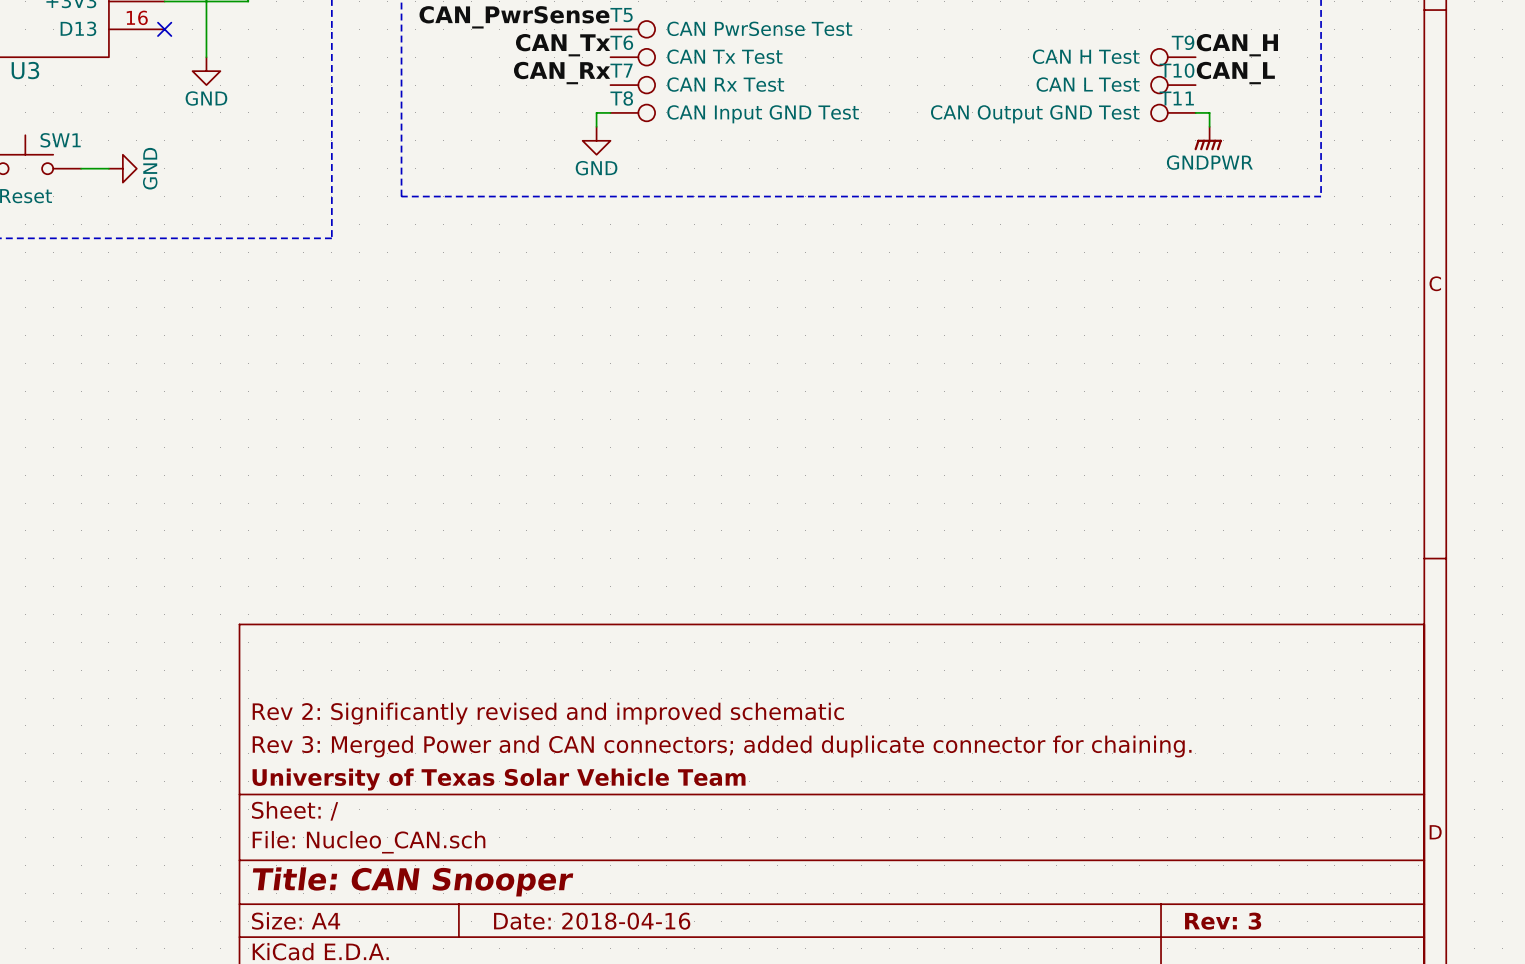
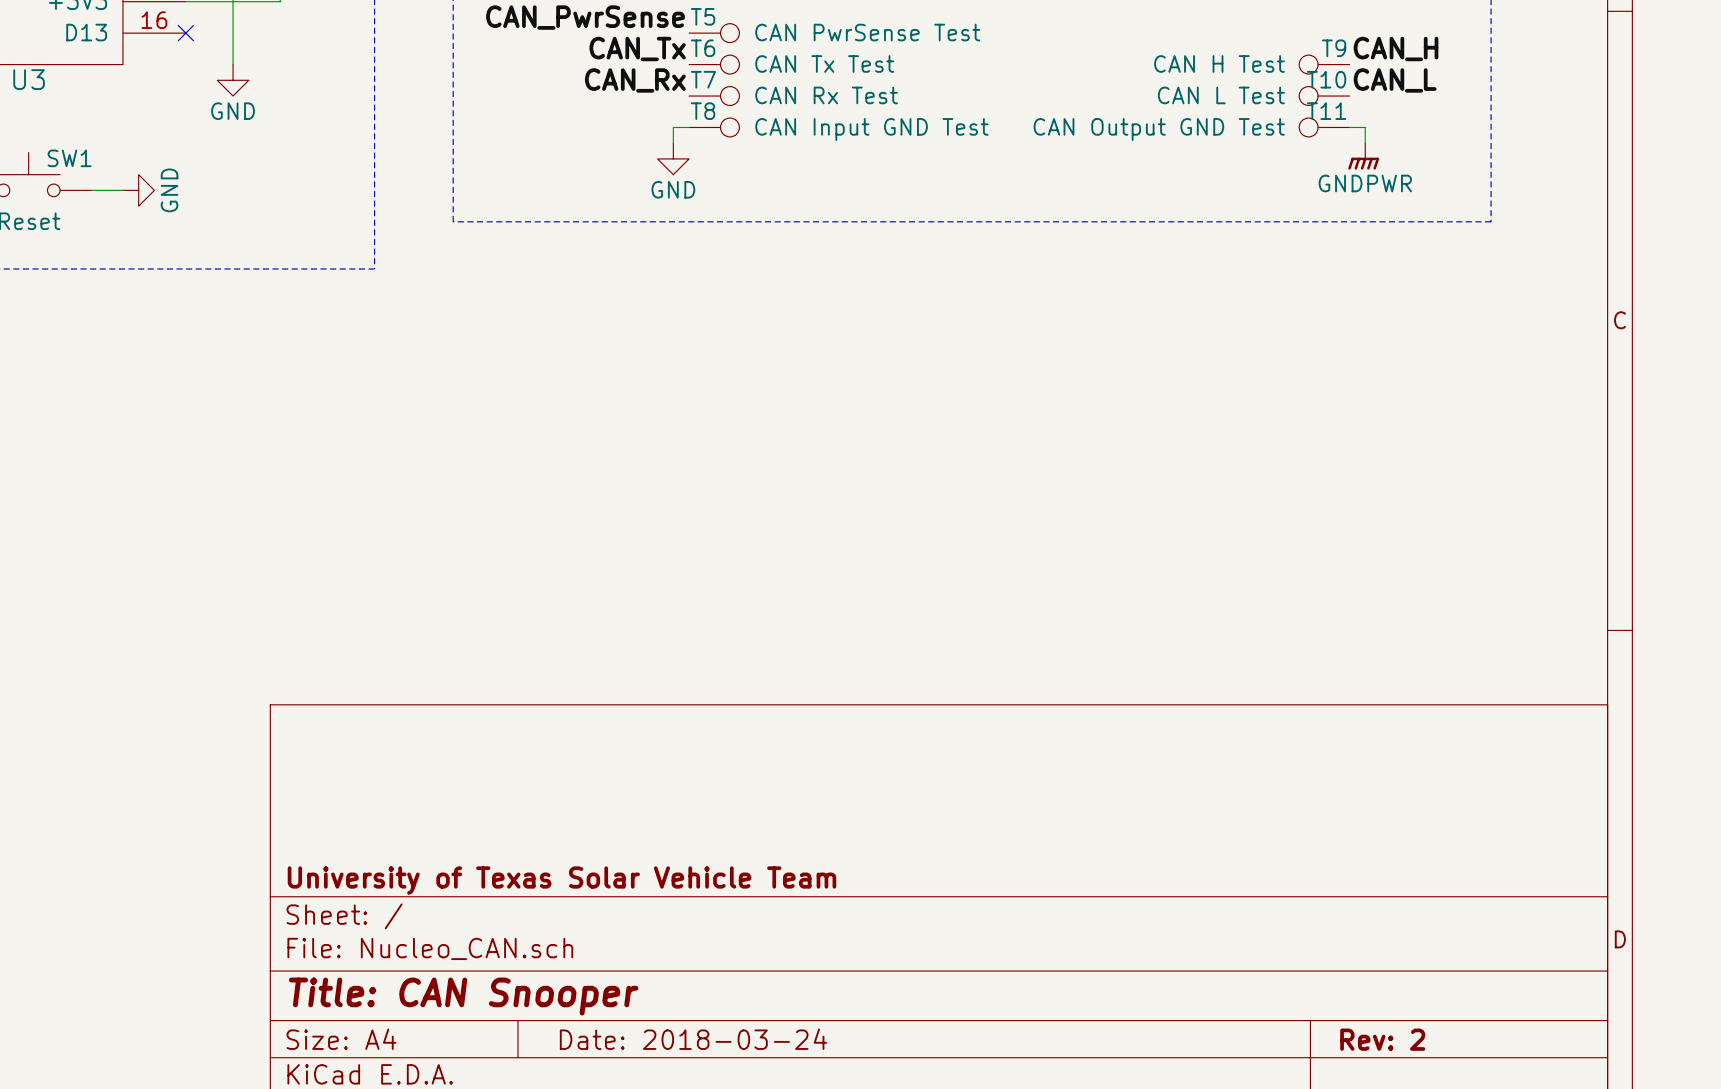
title block: Rev 2: Significantly revised and improved schematic (548, 713) -> none
title block: Rev 3: Merged Power and CAN connectors; added duplicate connector for chaining. (722, 746) -> none
title block: Date: 2018-04-16 (592, 921) -> Date: 2018-03-24 (693, 1039)
title block: Rev: 3 (1223, 921) -> Rev: 2 (1382, 1039)

